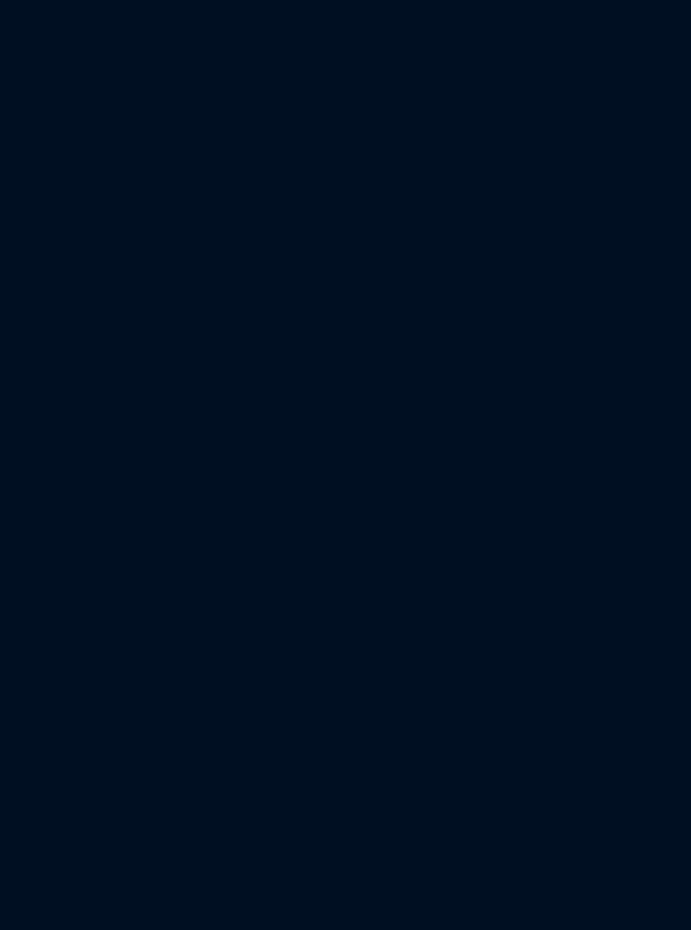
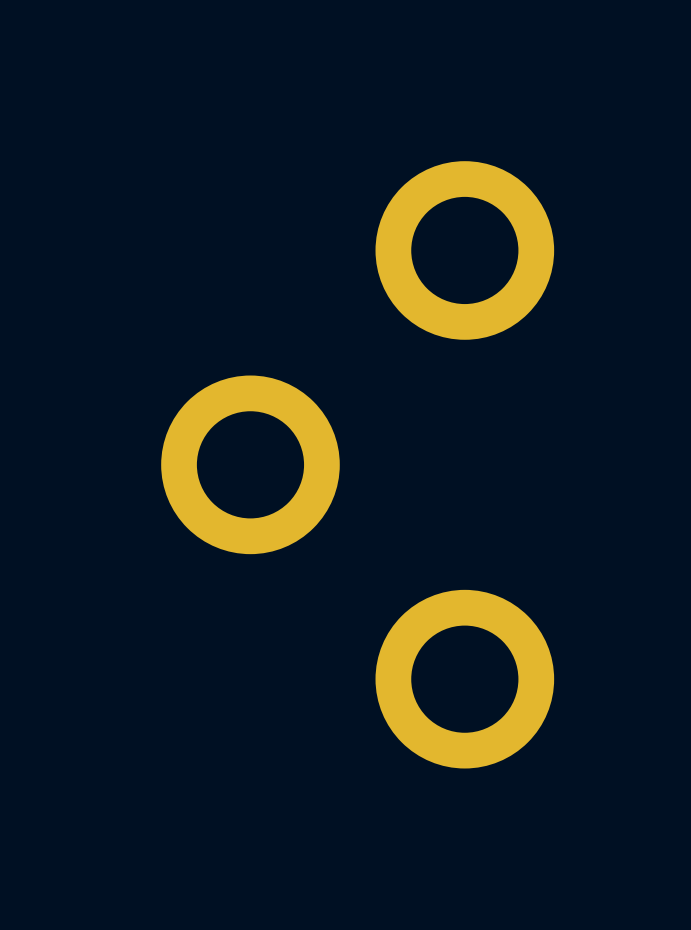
part: none -> (357, 464)

